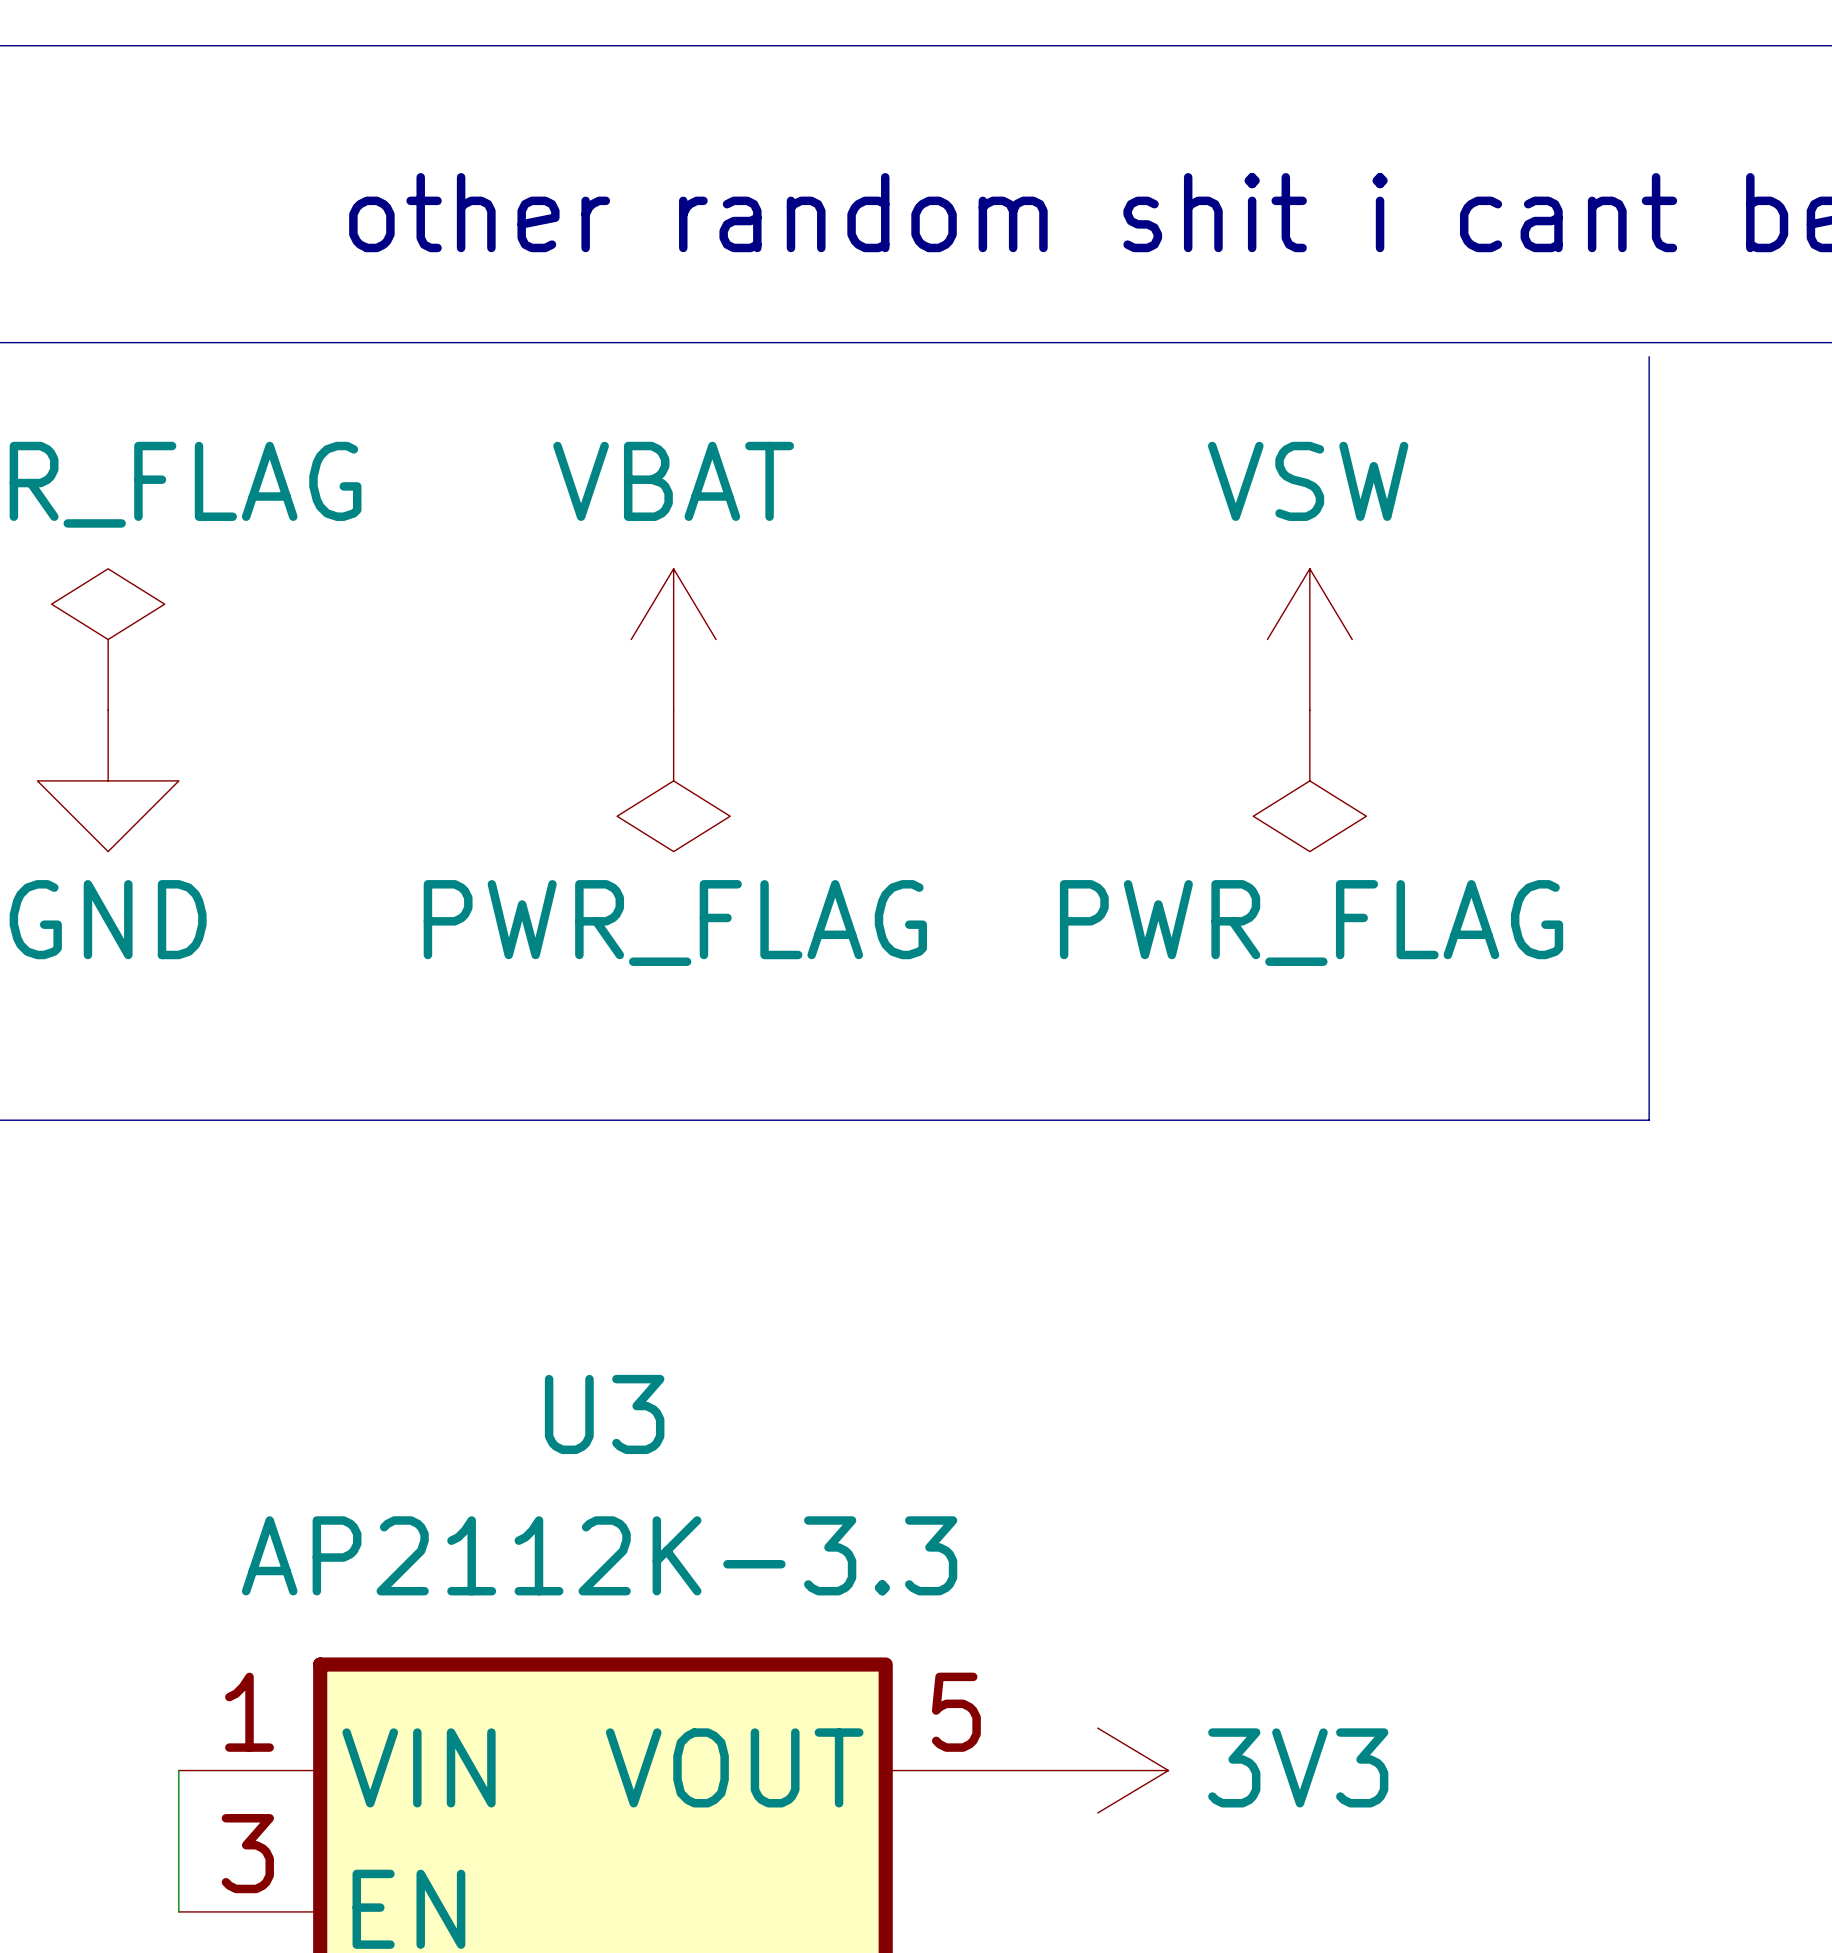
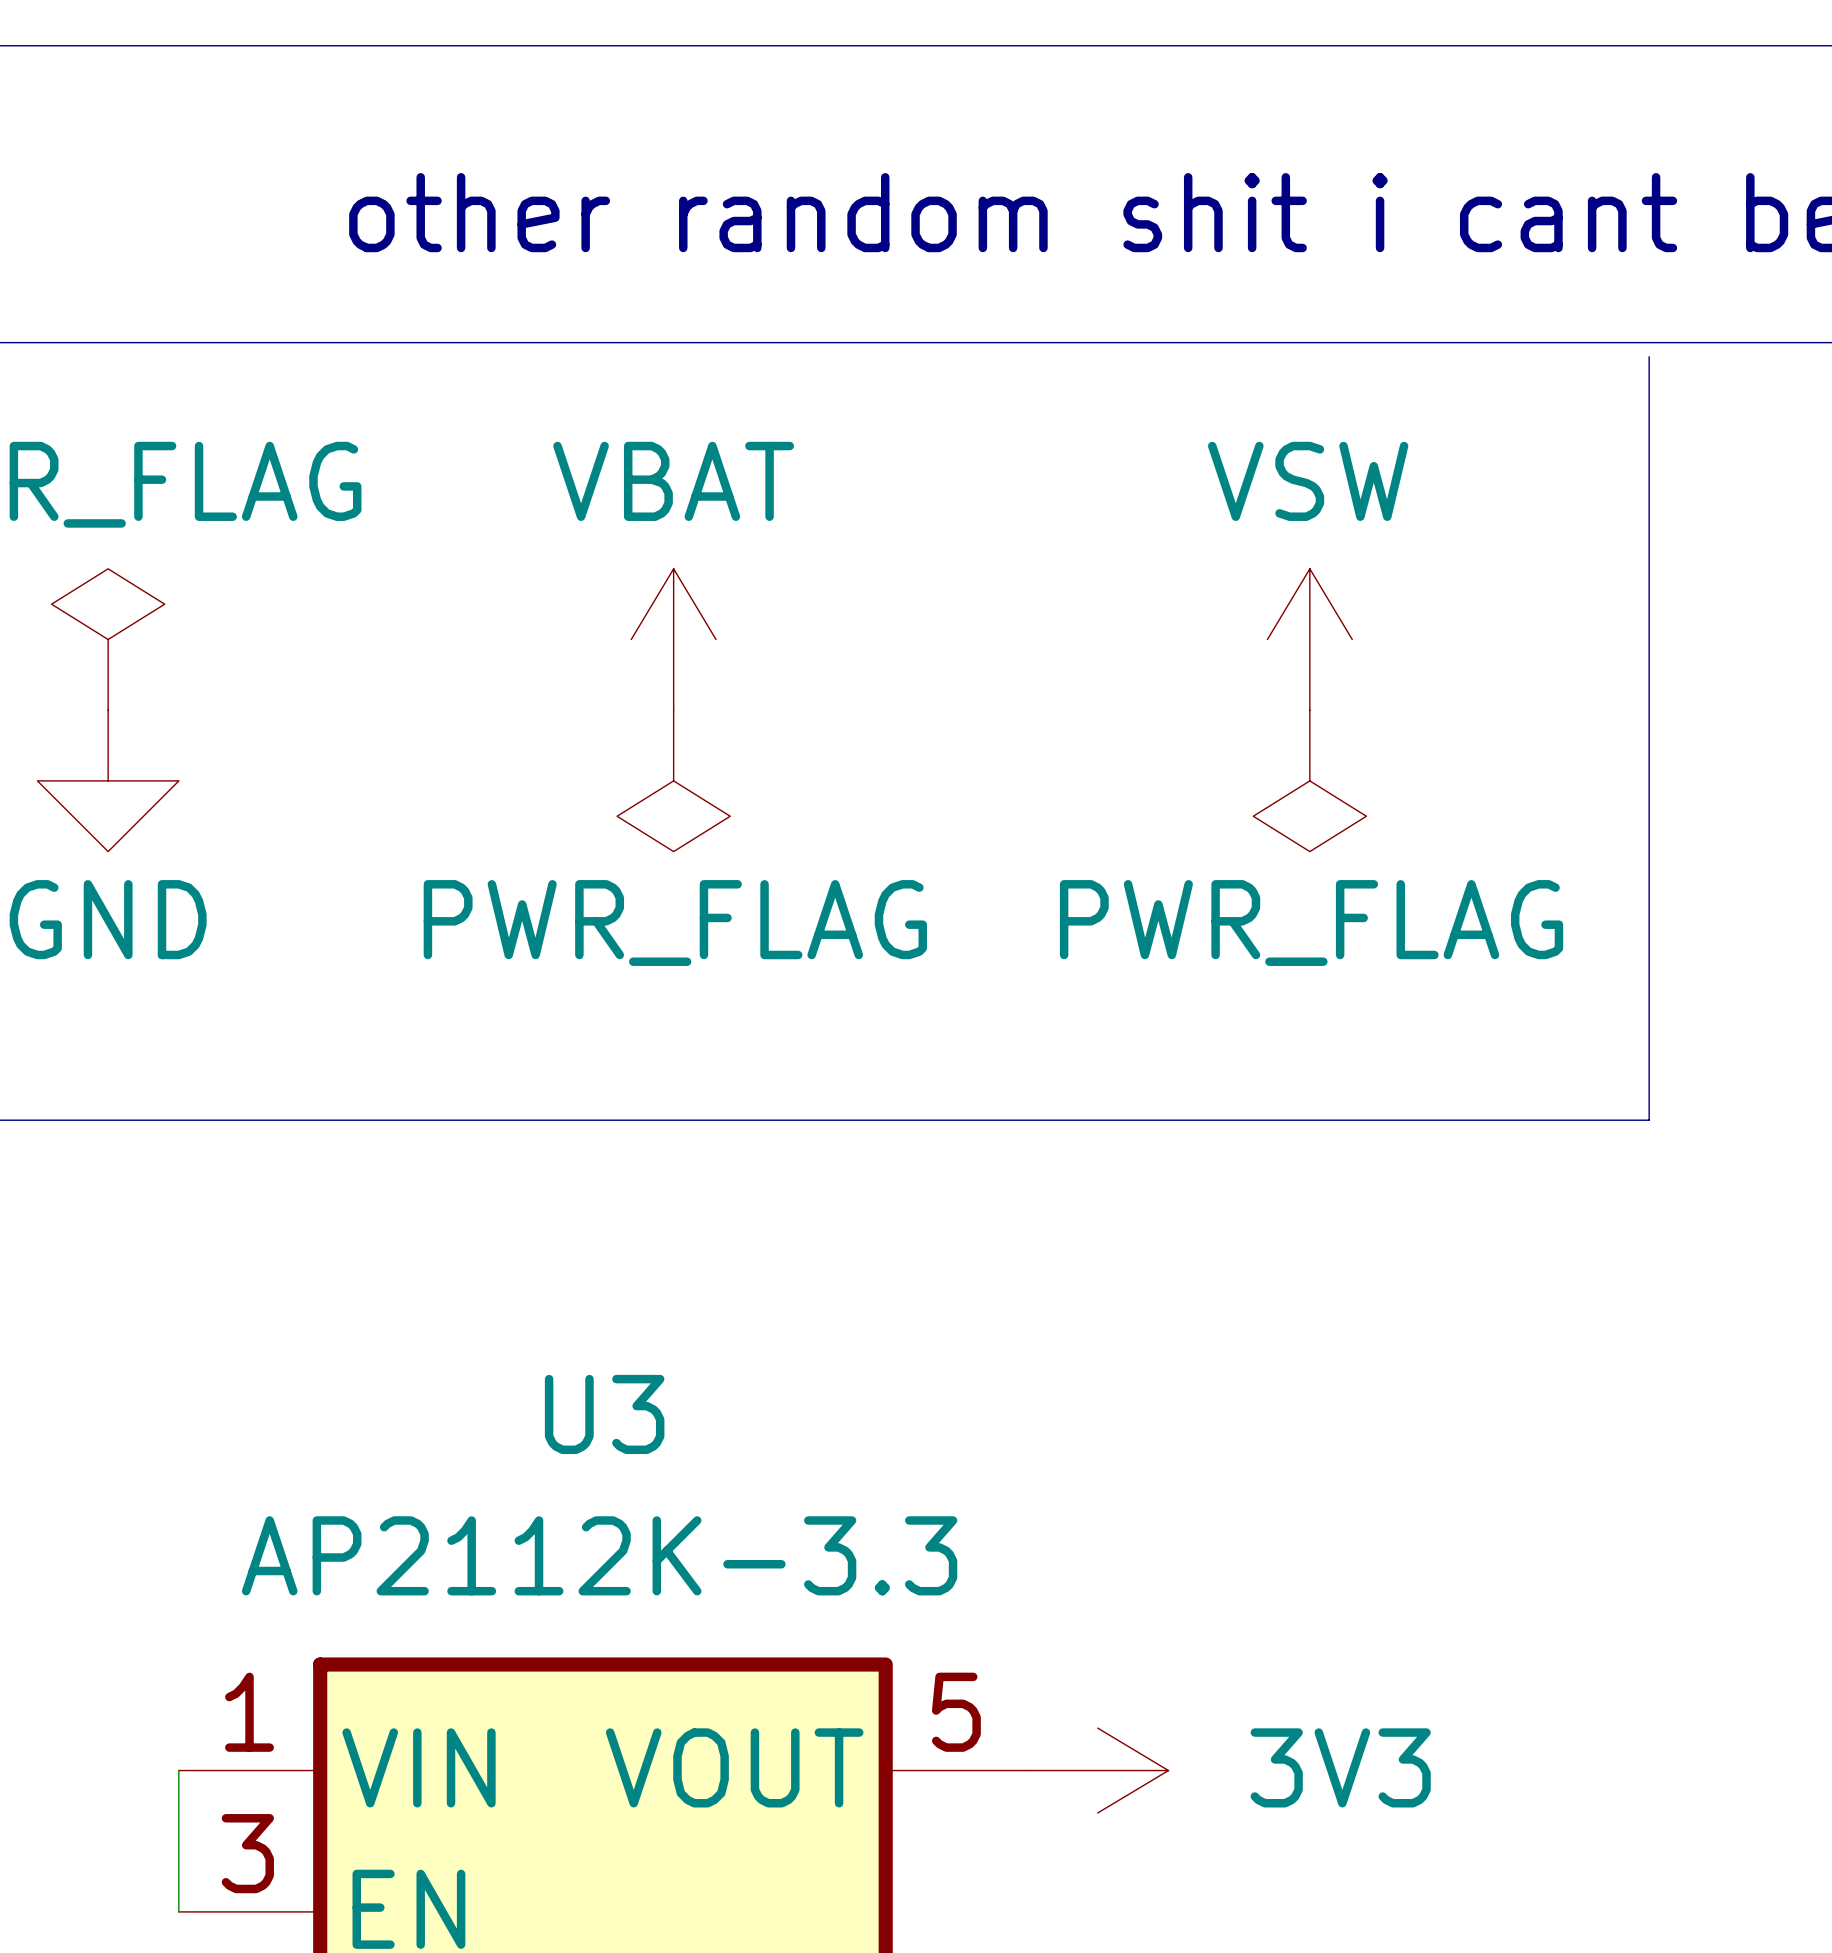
power symbol text position: 3V3 (1298, 1767) -> 3V3 (1340, 1767)

